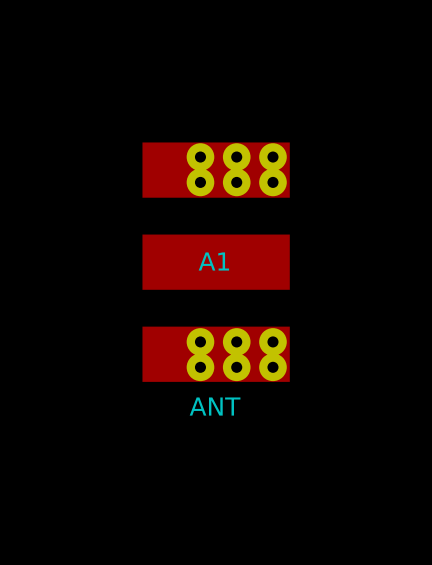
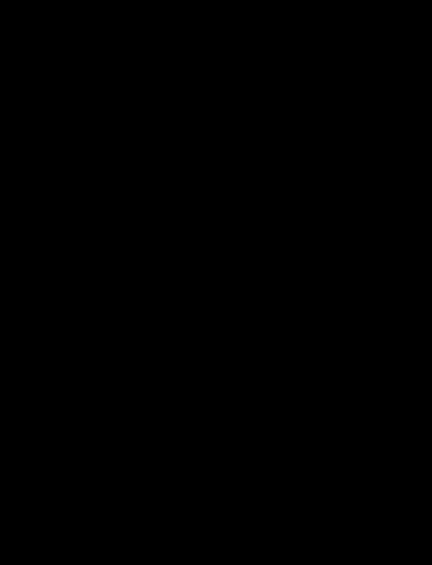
A1: ANT (216, 262) -> none

